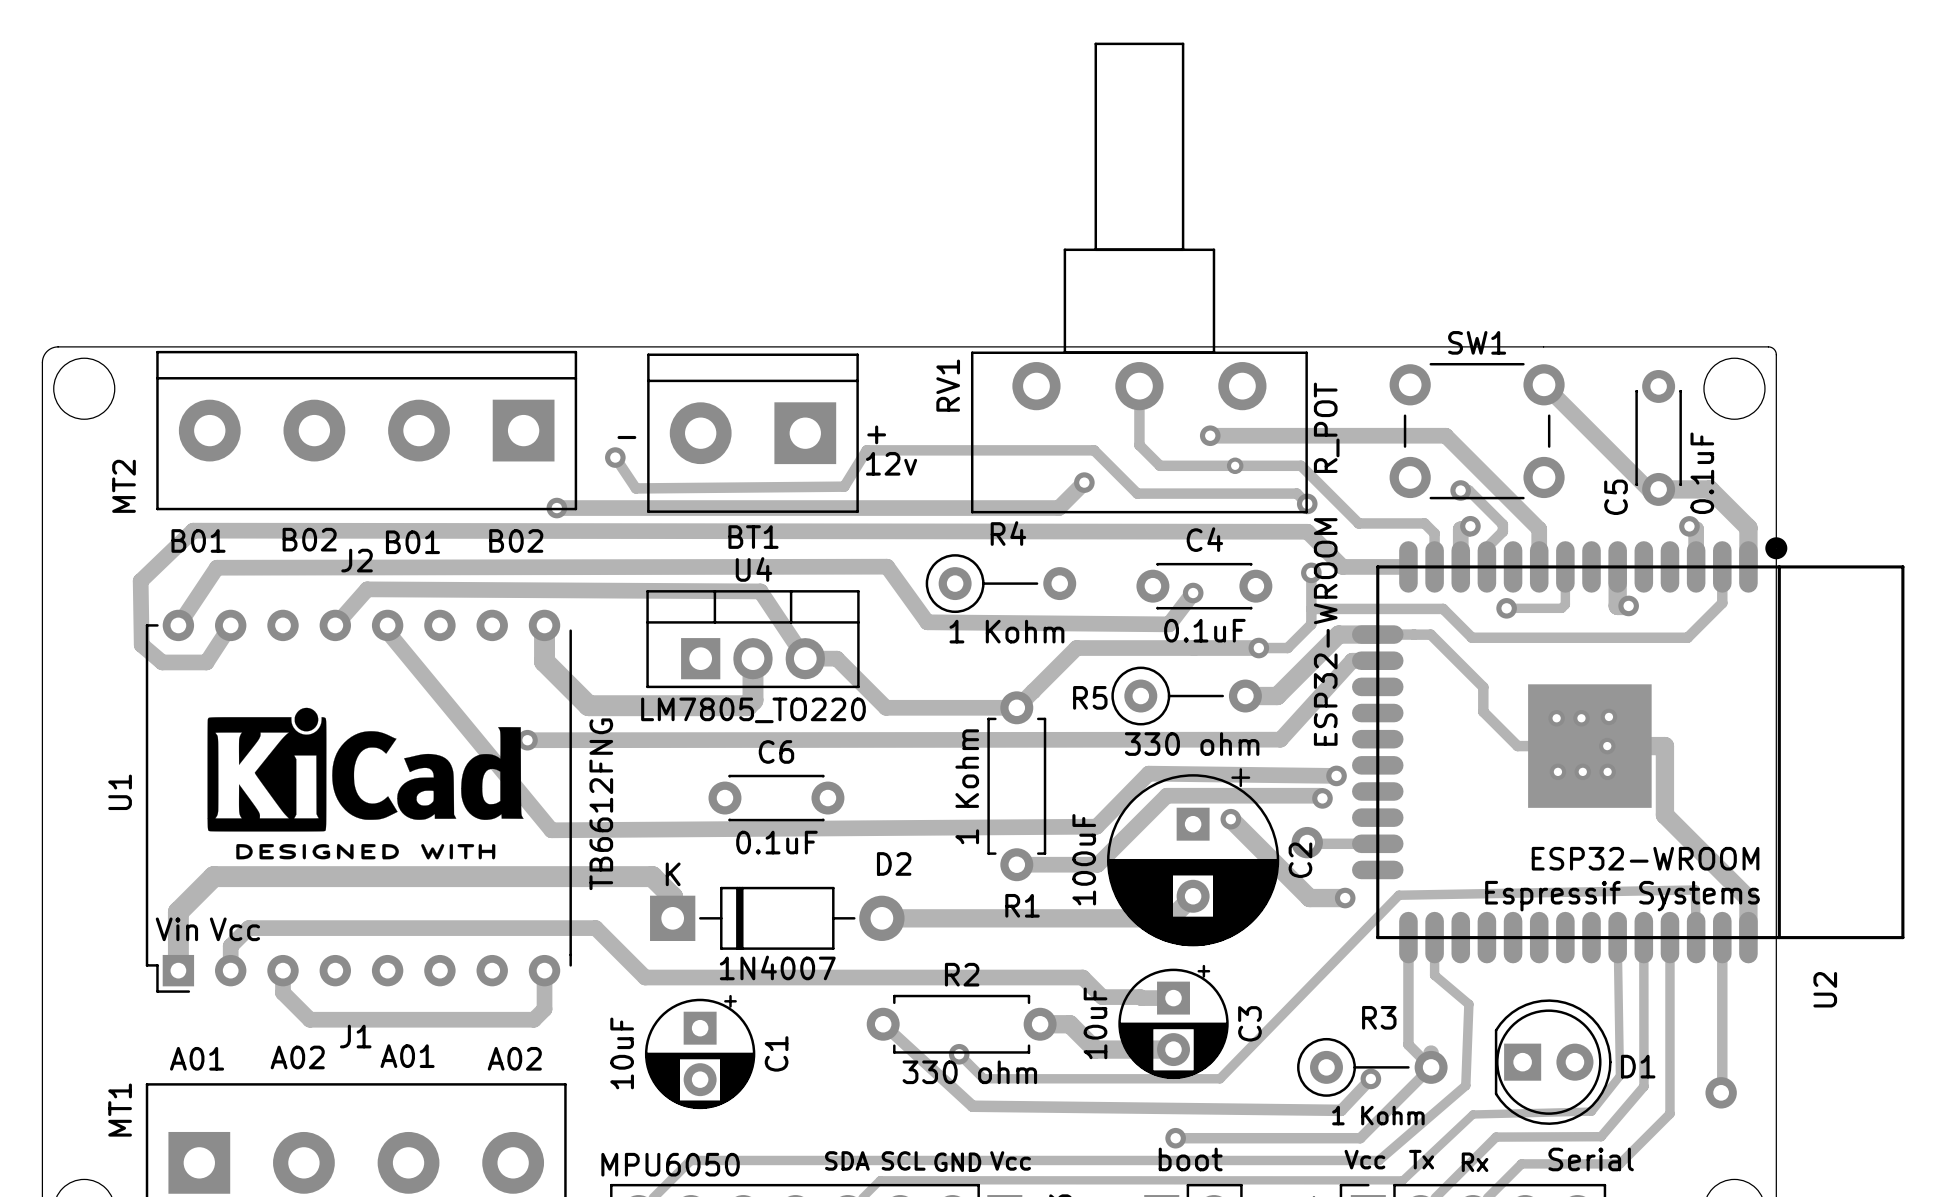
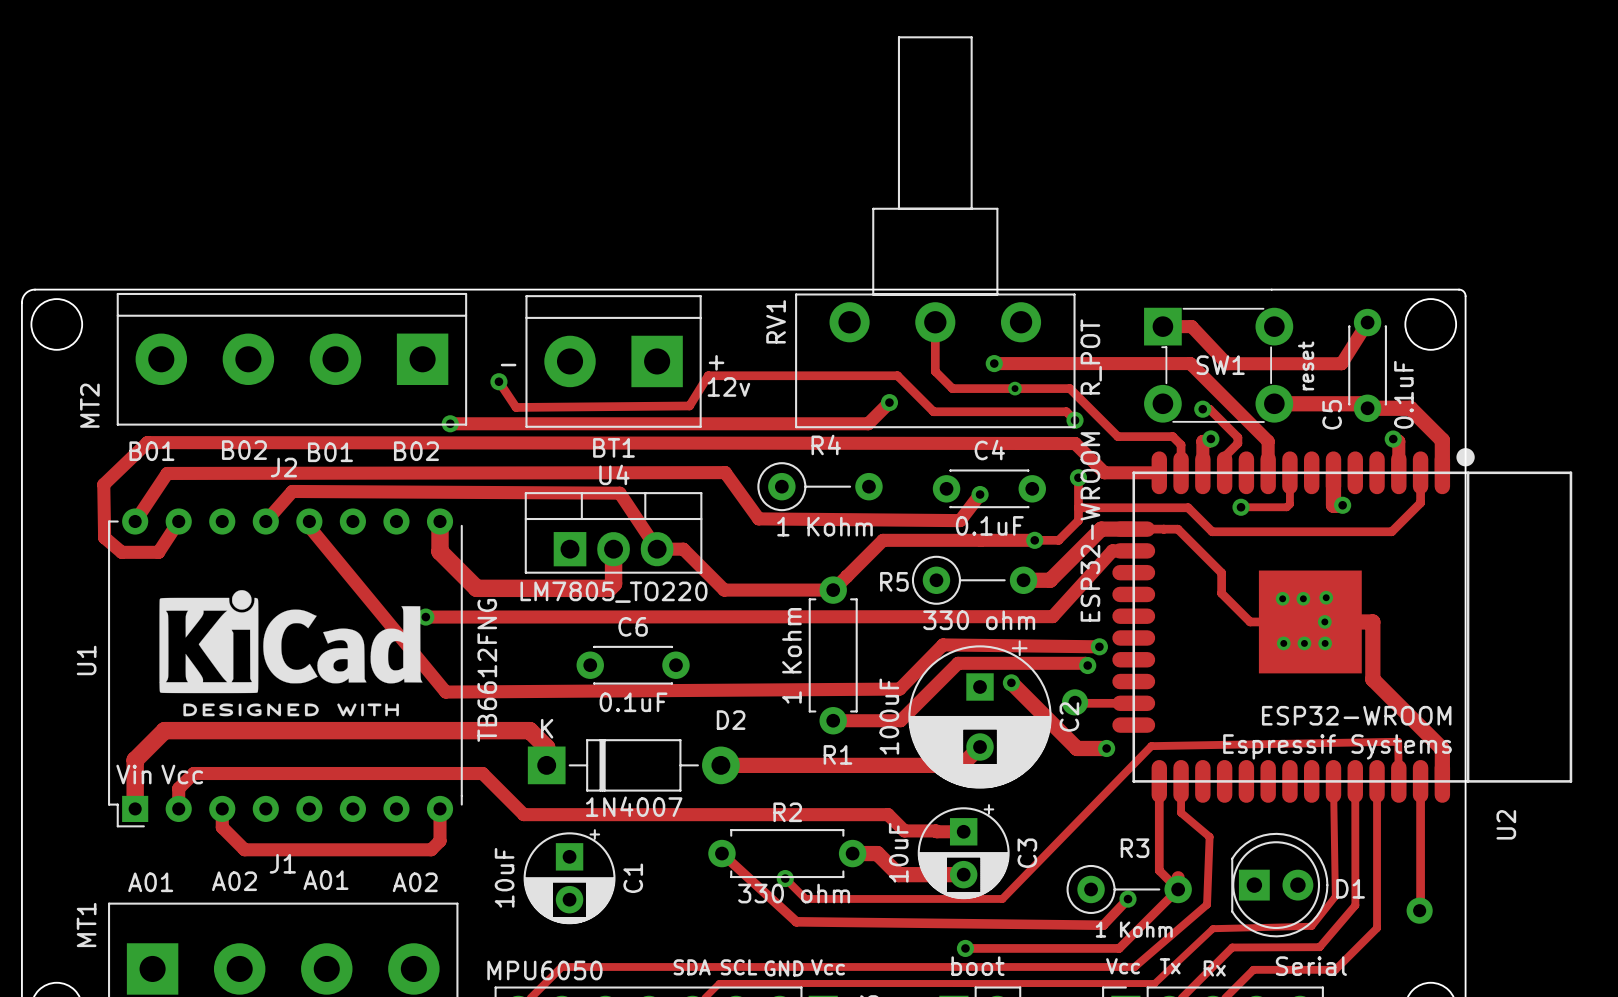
SW1 name position: SW1 (1477, 342) -> SW1 (1220, 365)
SW1 footprint: [1389, 362, 1565, 500] -> [1144, 307, 1294, 423]
track: (1544, 384) (1648, 489) (1658, 489) -> (1274, 403) (1363, 403) (1367, 408)
track: none -> (1367, 322) (1341, 363) (1226, 363) (1191, 326) (1162, 326)
SW1 value: none -> reset (1306, 365)

